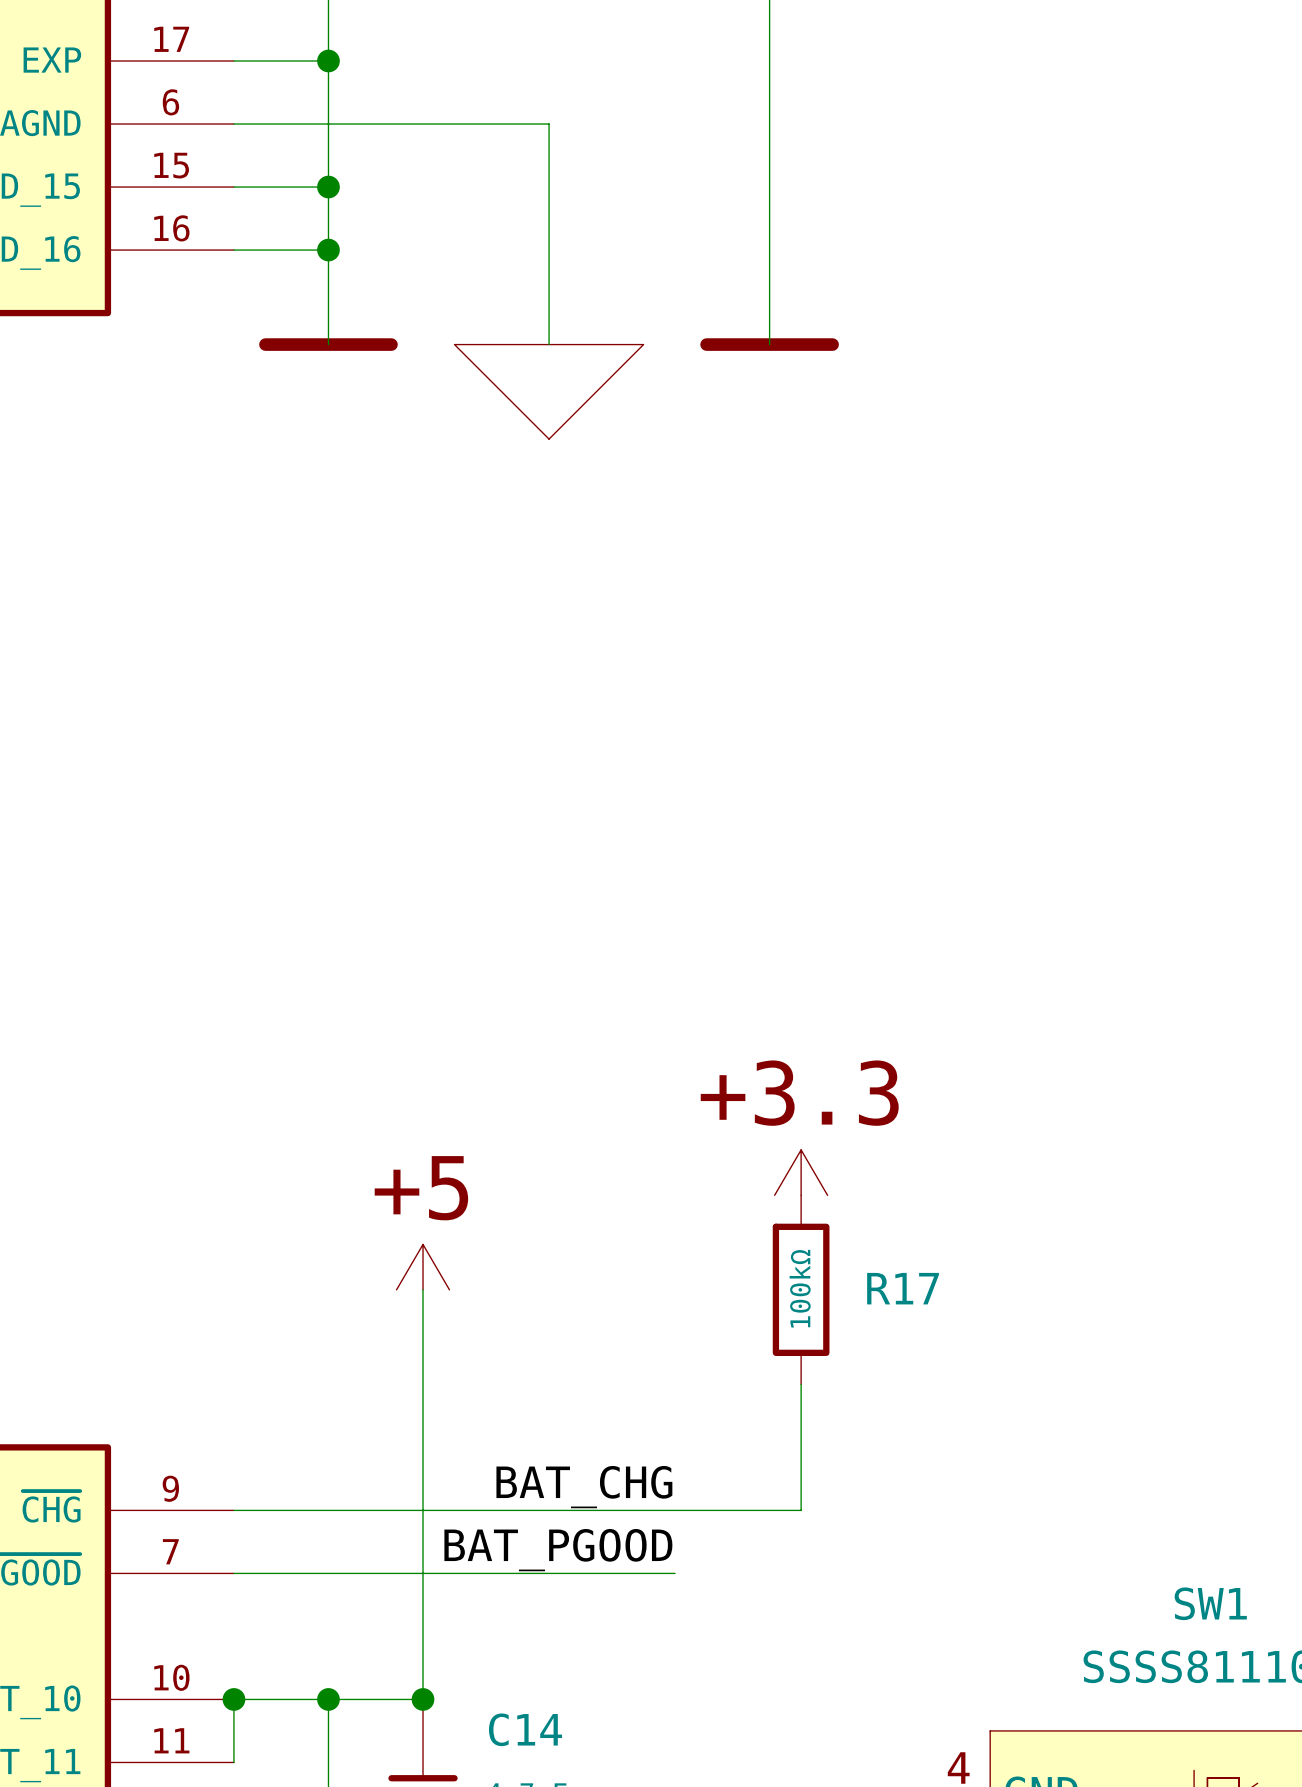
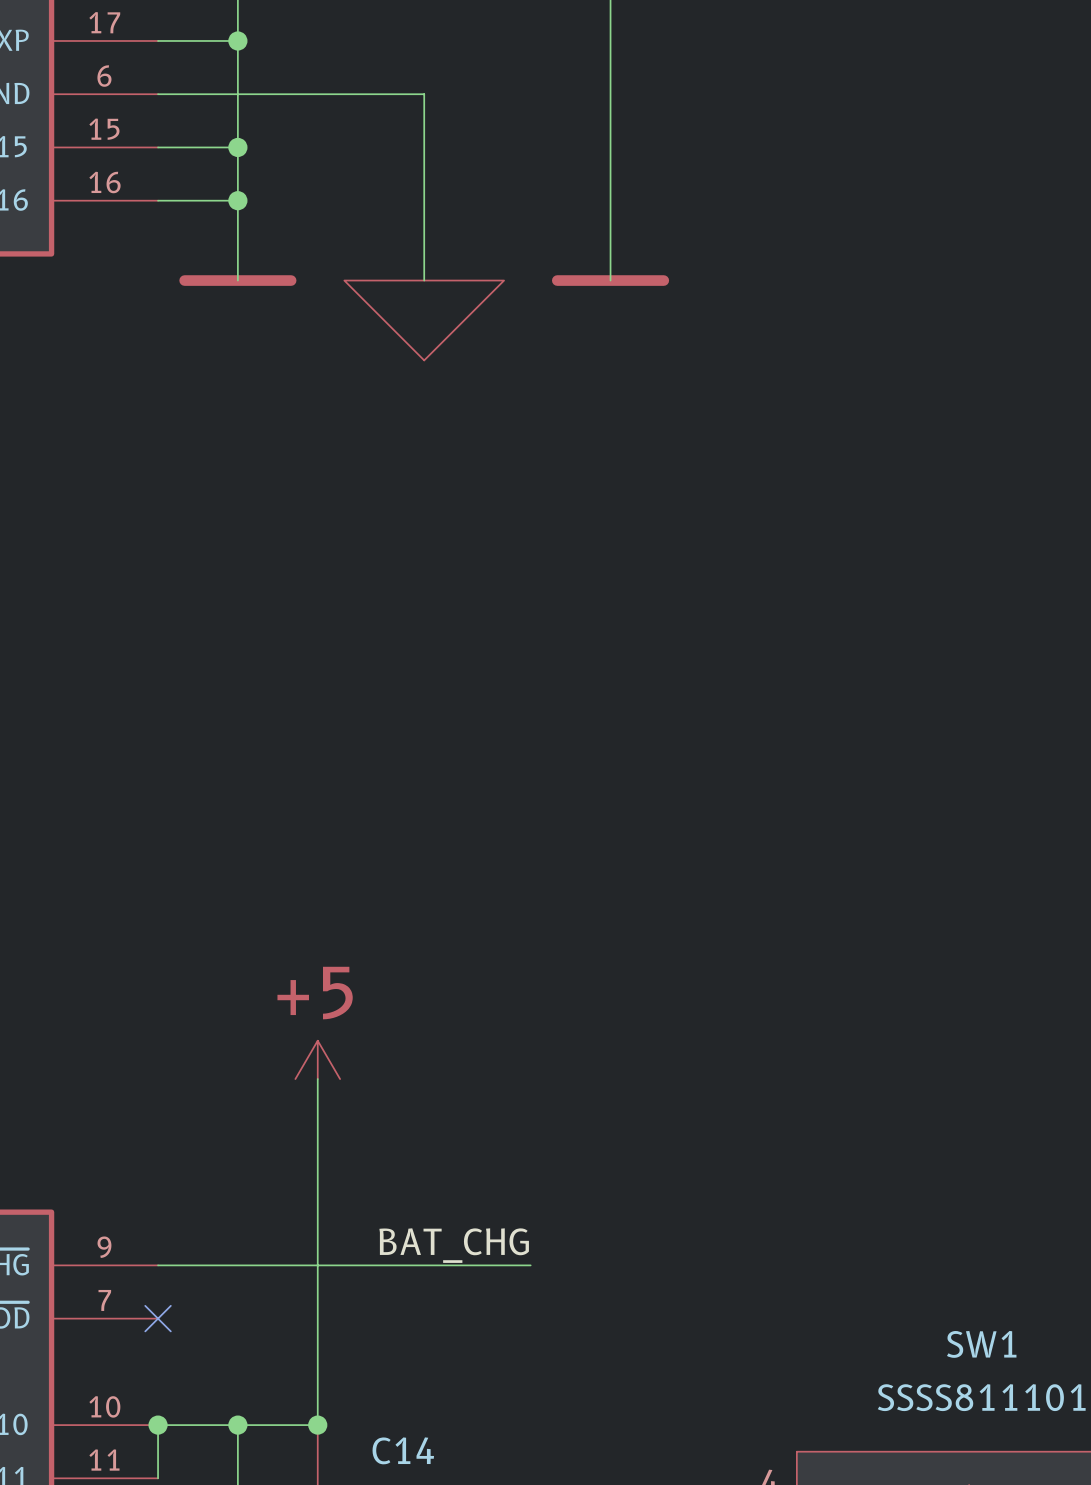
power symbol: (801, 1172) -> none
R17: 100kΩ (801, 1289) -> none
wire: (801, 1384) (801, 1510) (675, 1510) -> none
label: BAT_PGOOD (558, 1550) -> none
wire: (233, 1573) (675, 1573) -> none
no-connect mark: none -> (158, 1318)

